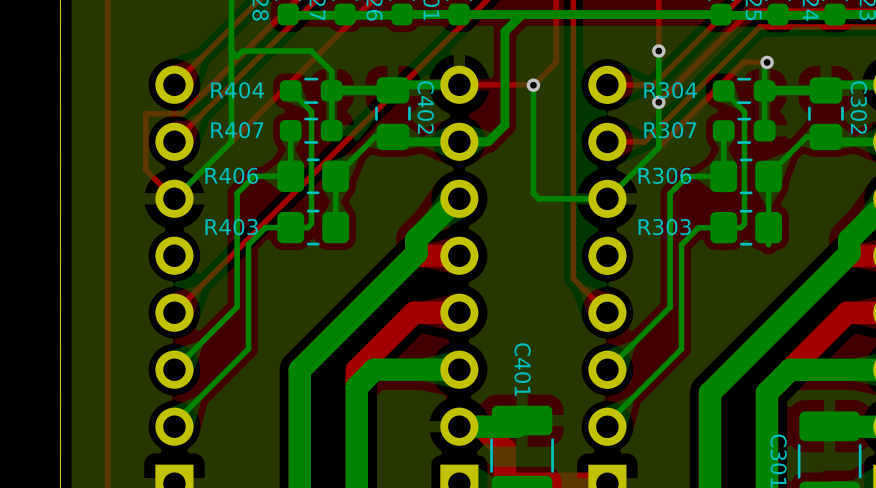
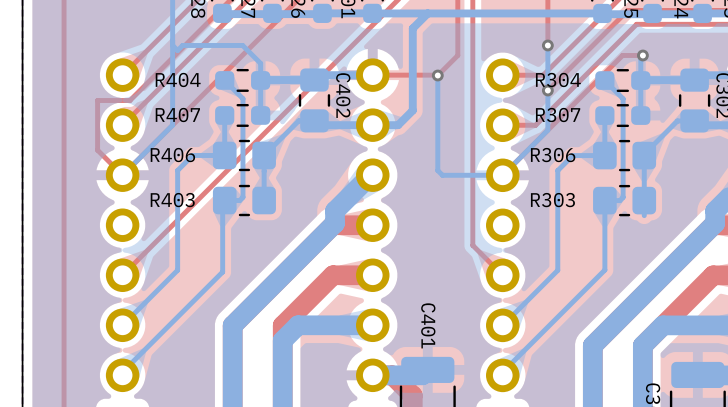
bottom track: (288, 227) (265, 227) (248, 244) (248, 348) -> (222, 200) (222, 272) (187, 307)
bottom track: (723, 227) (698, 227) (681, 244) (681, 349) -> (604, 200) (604, 270) (567, 307)

